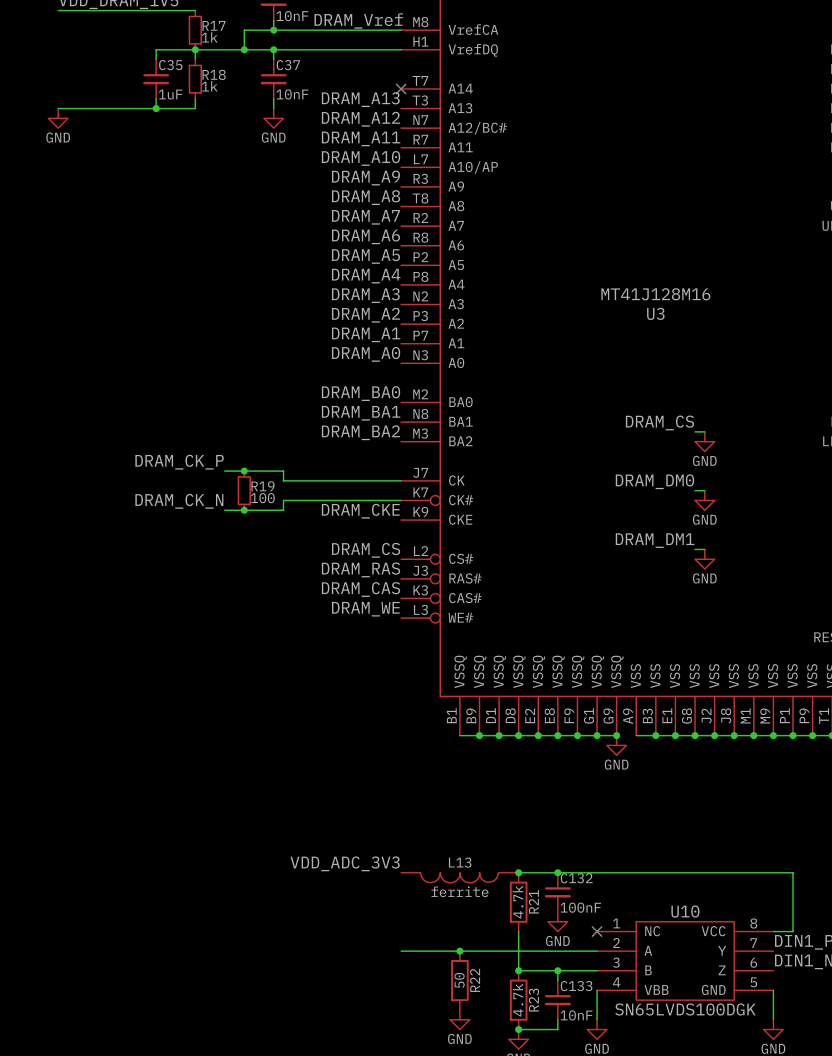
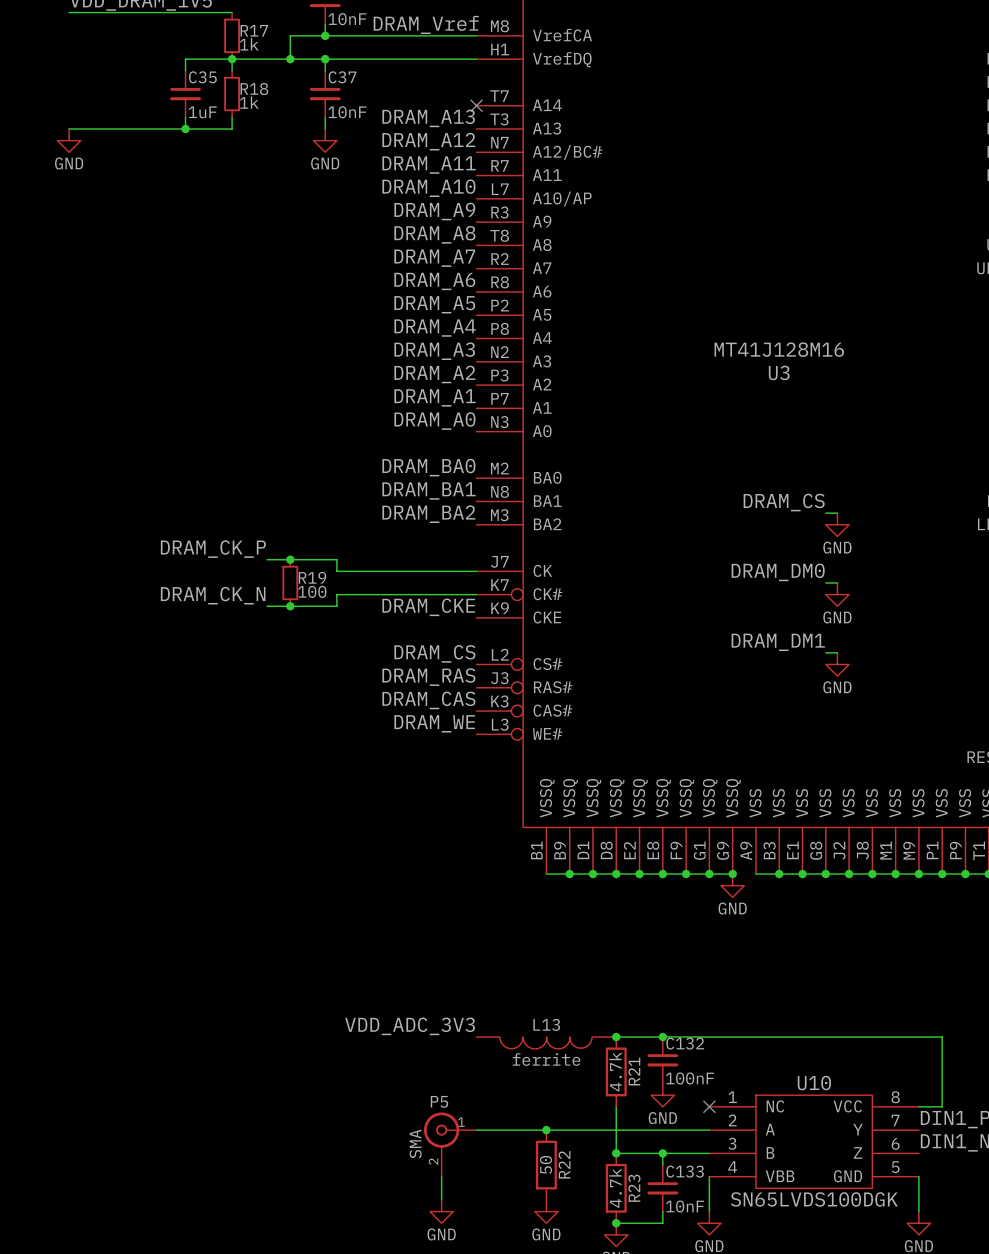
P5: none -> SMA (450, 1144)
wire: none -> (441, 1176) (441, 1199)
power symbol: none -> GND (441, 1211)

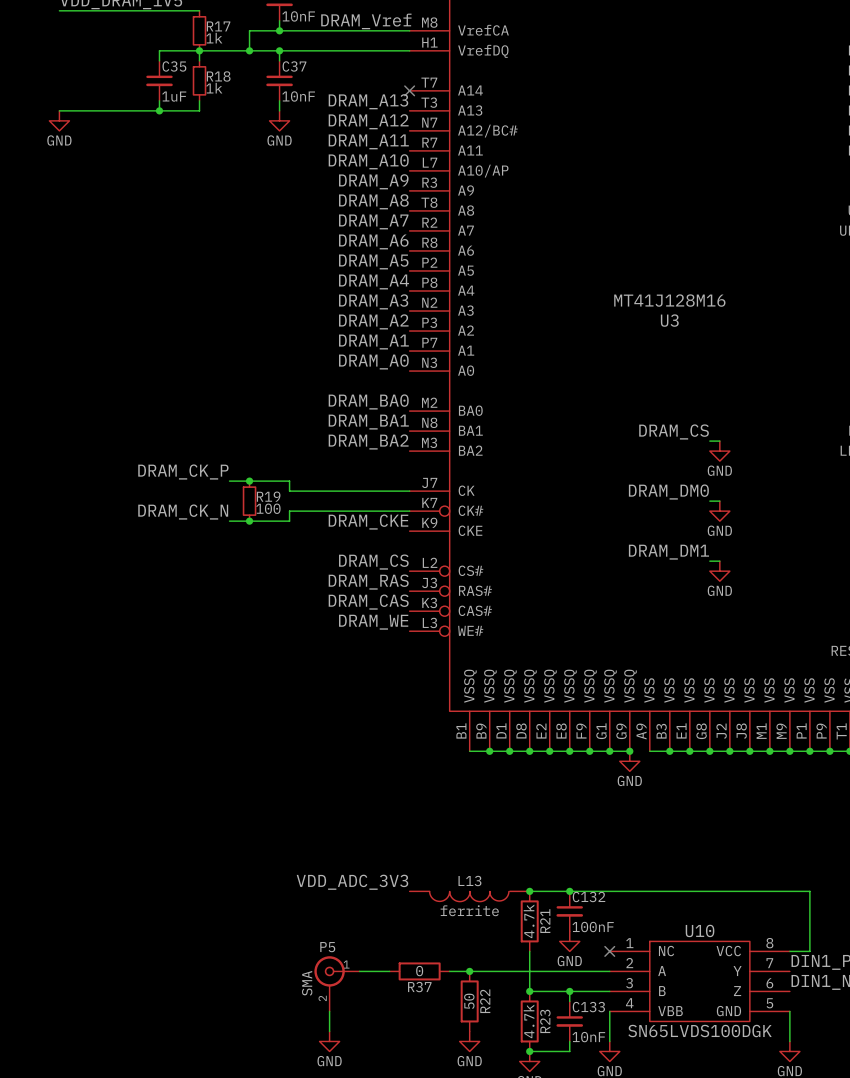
wire: none -> (359, 971) (389, 971)
wire: (476, 1130) (523, 1130) -> none
R37: none -> 0 (419, 971)
P5 position: (450, 1144) -> (336, 983)
wire: (441, 1176) (441, 1199) -> (329, 1011) (329, 1031)
power symbol position: GND (441, 1211) -> GND (329, 1041)

